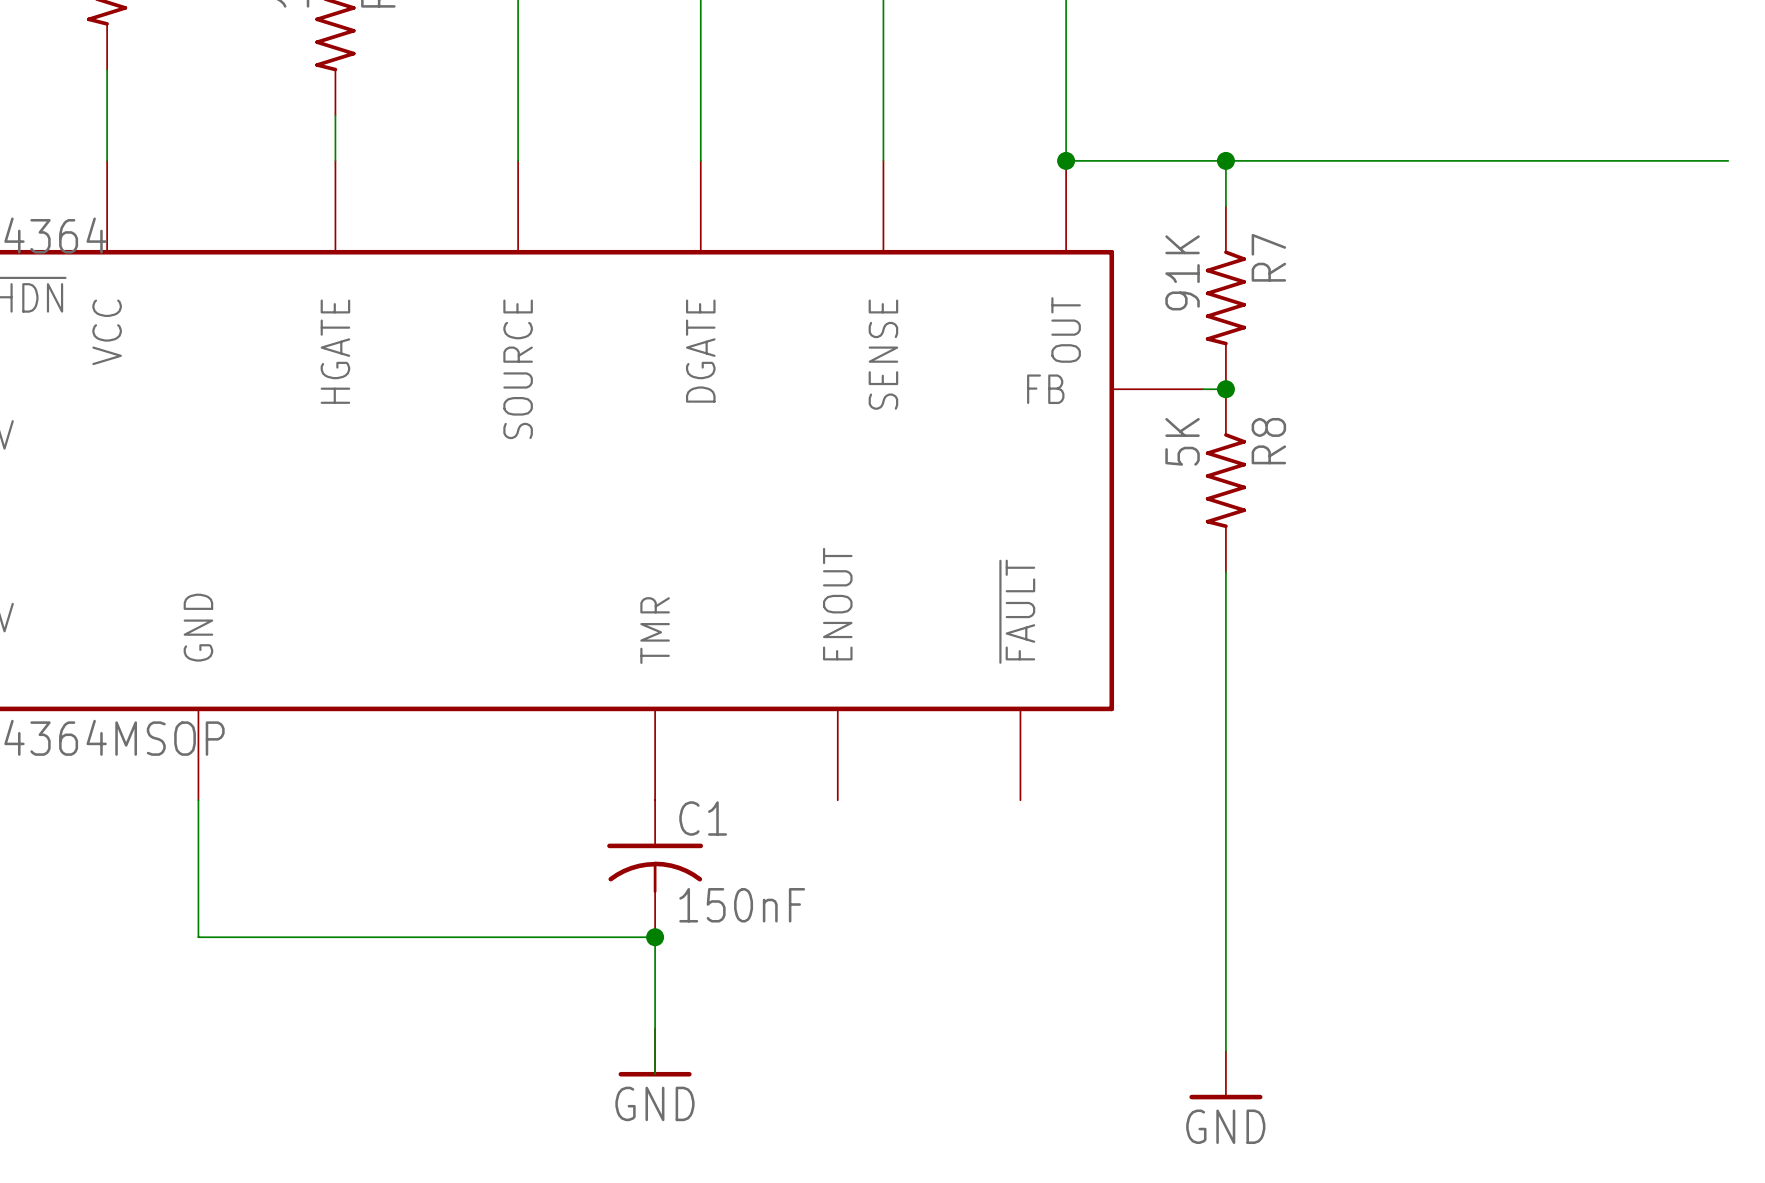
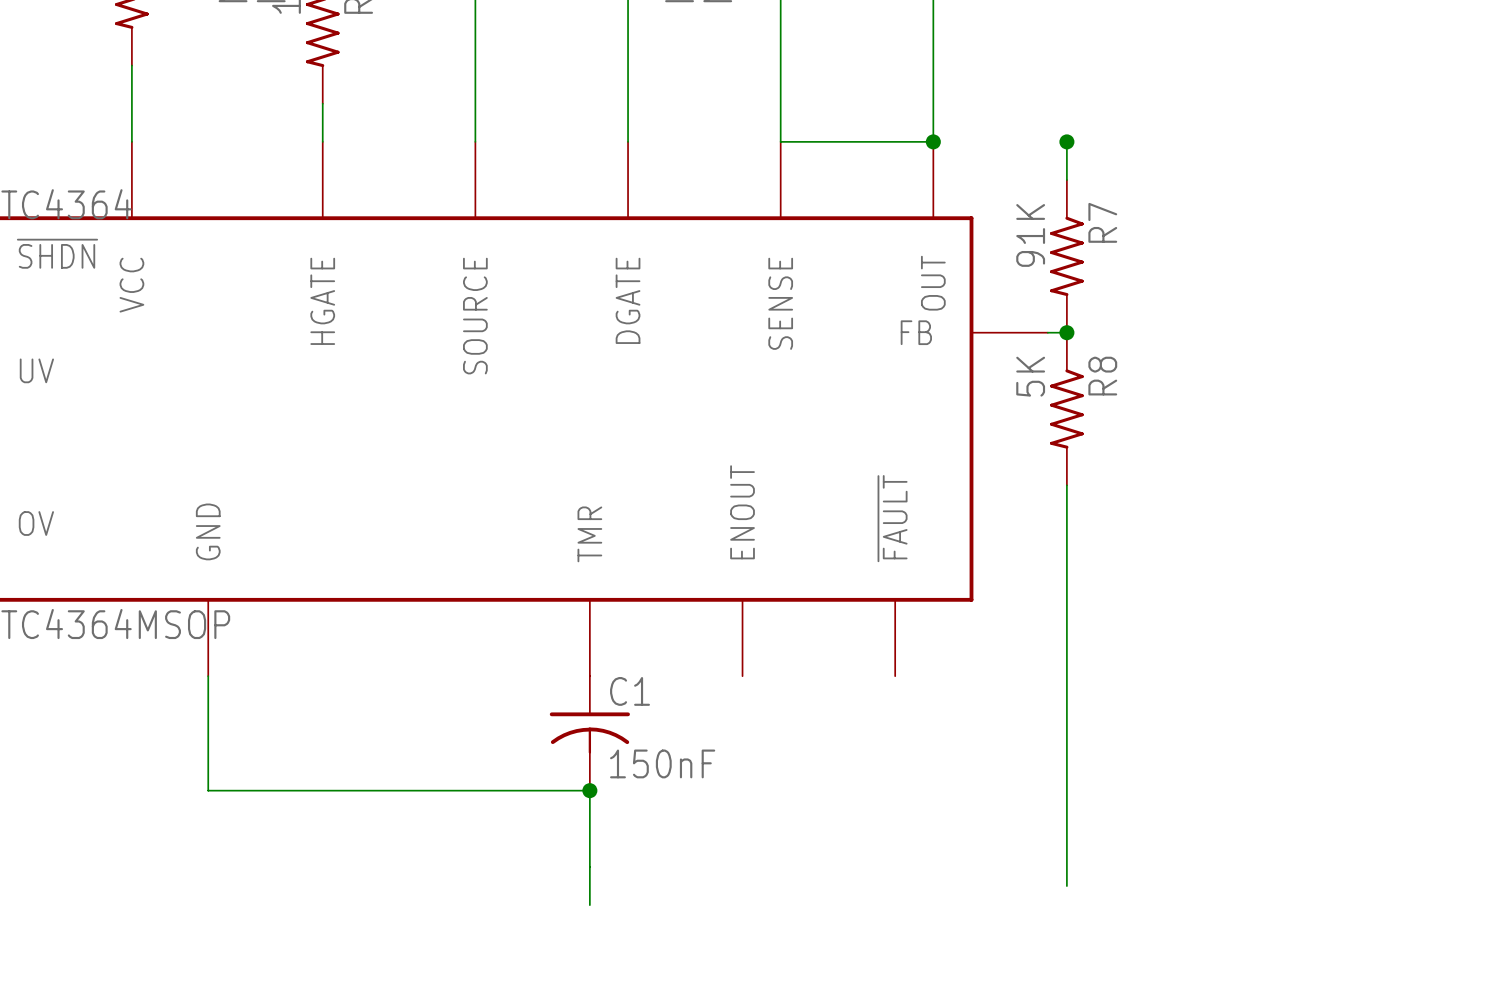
wire: (1066, 160) (1728, 160) -> (933, 141) (780, 141)
power symbol: GND (655, 1052) -> none
power symbol: GND (1225, 1075) -> none

